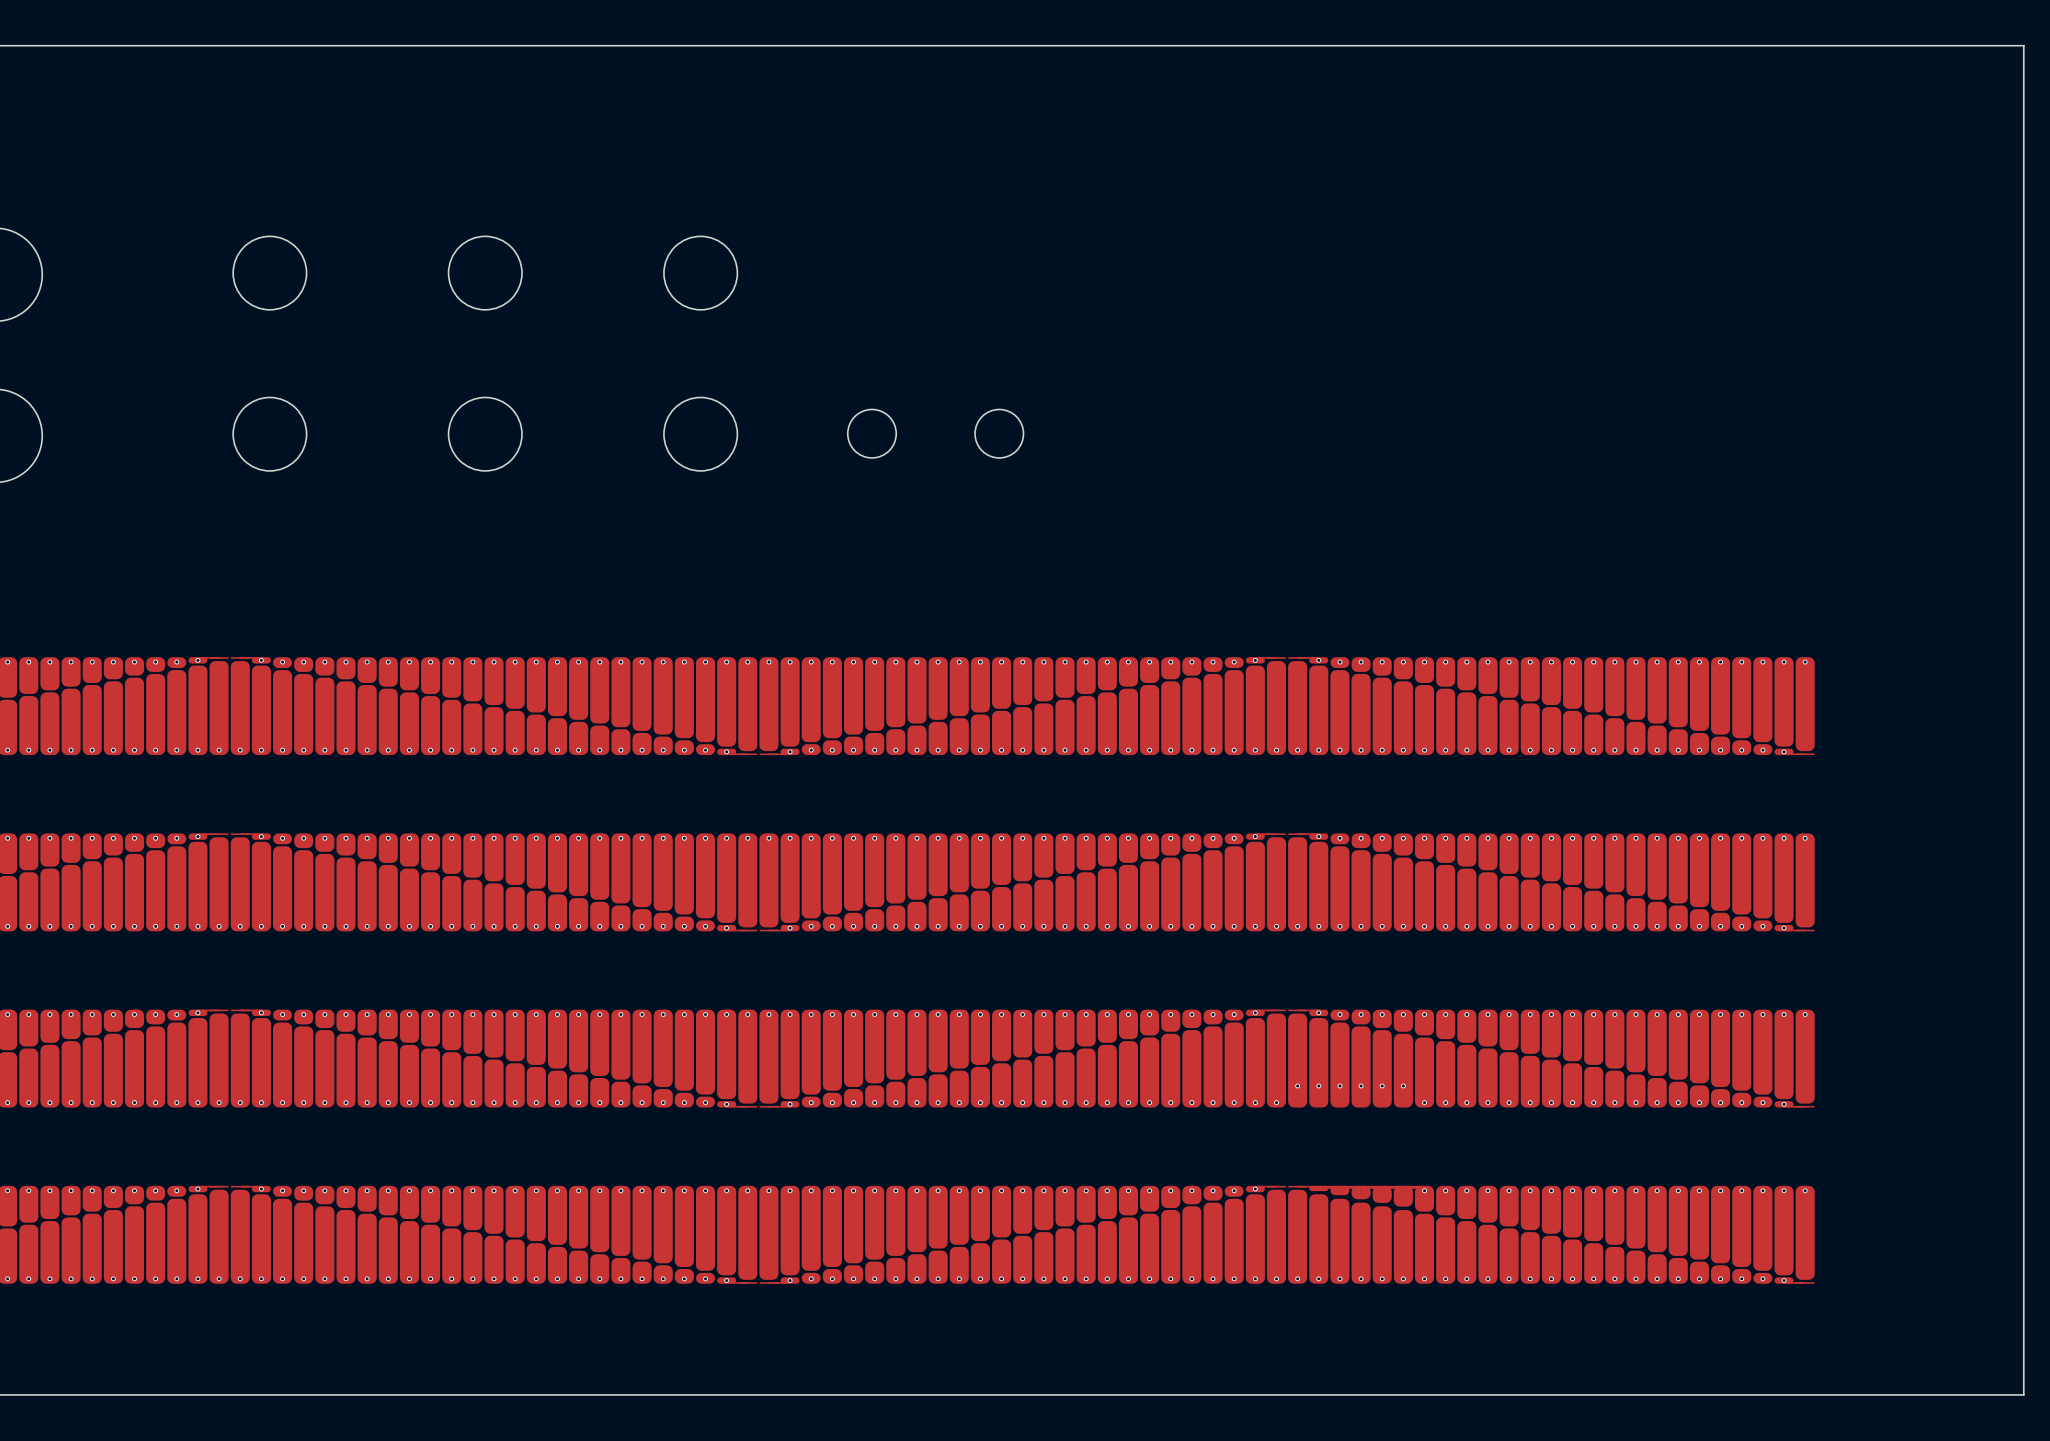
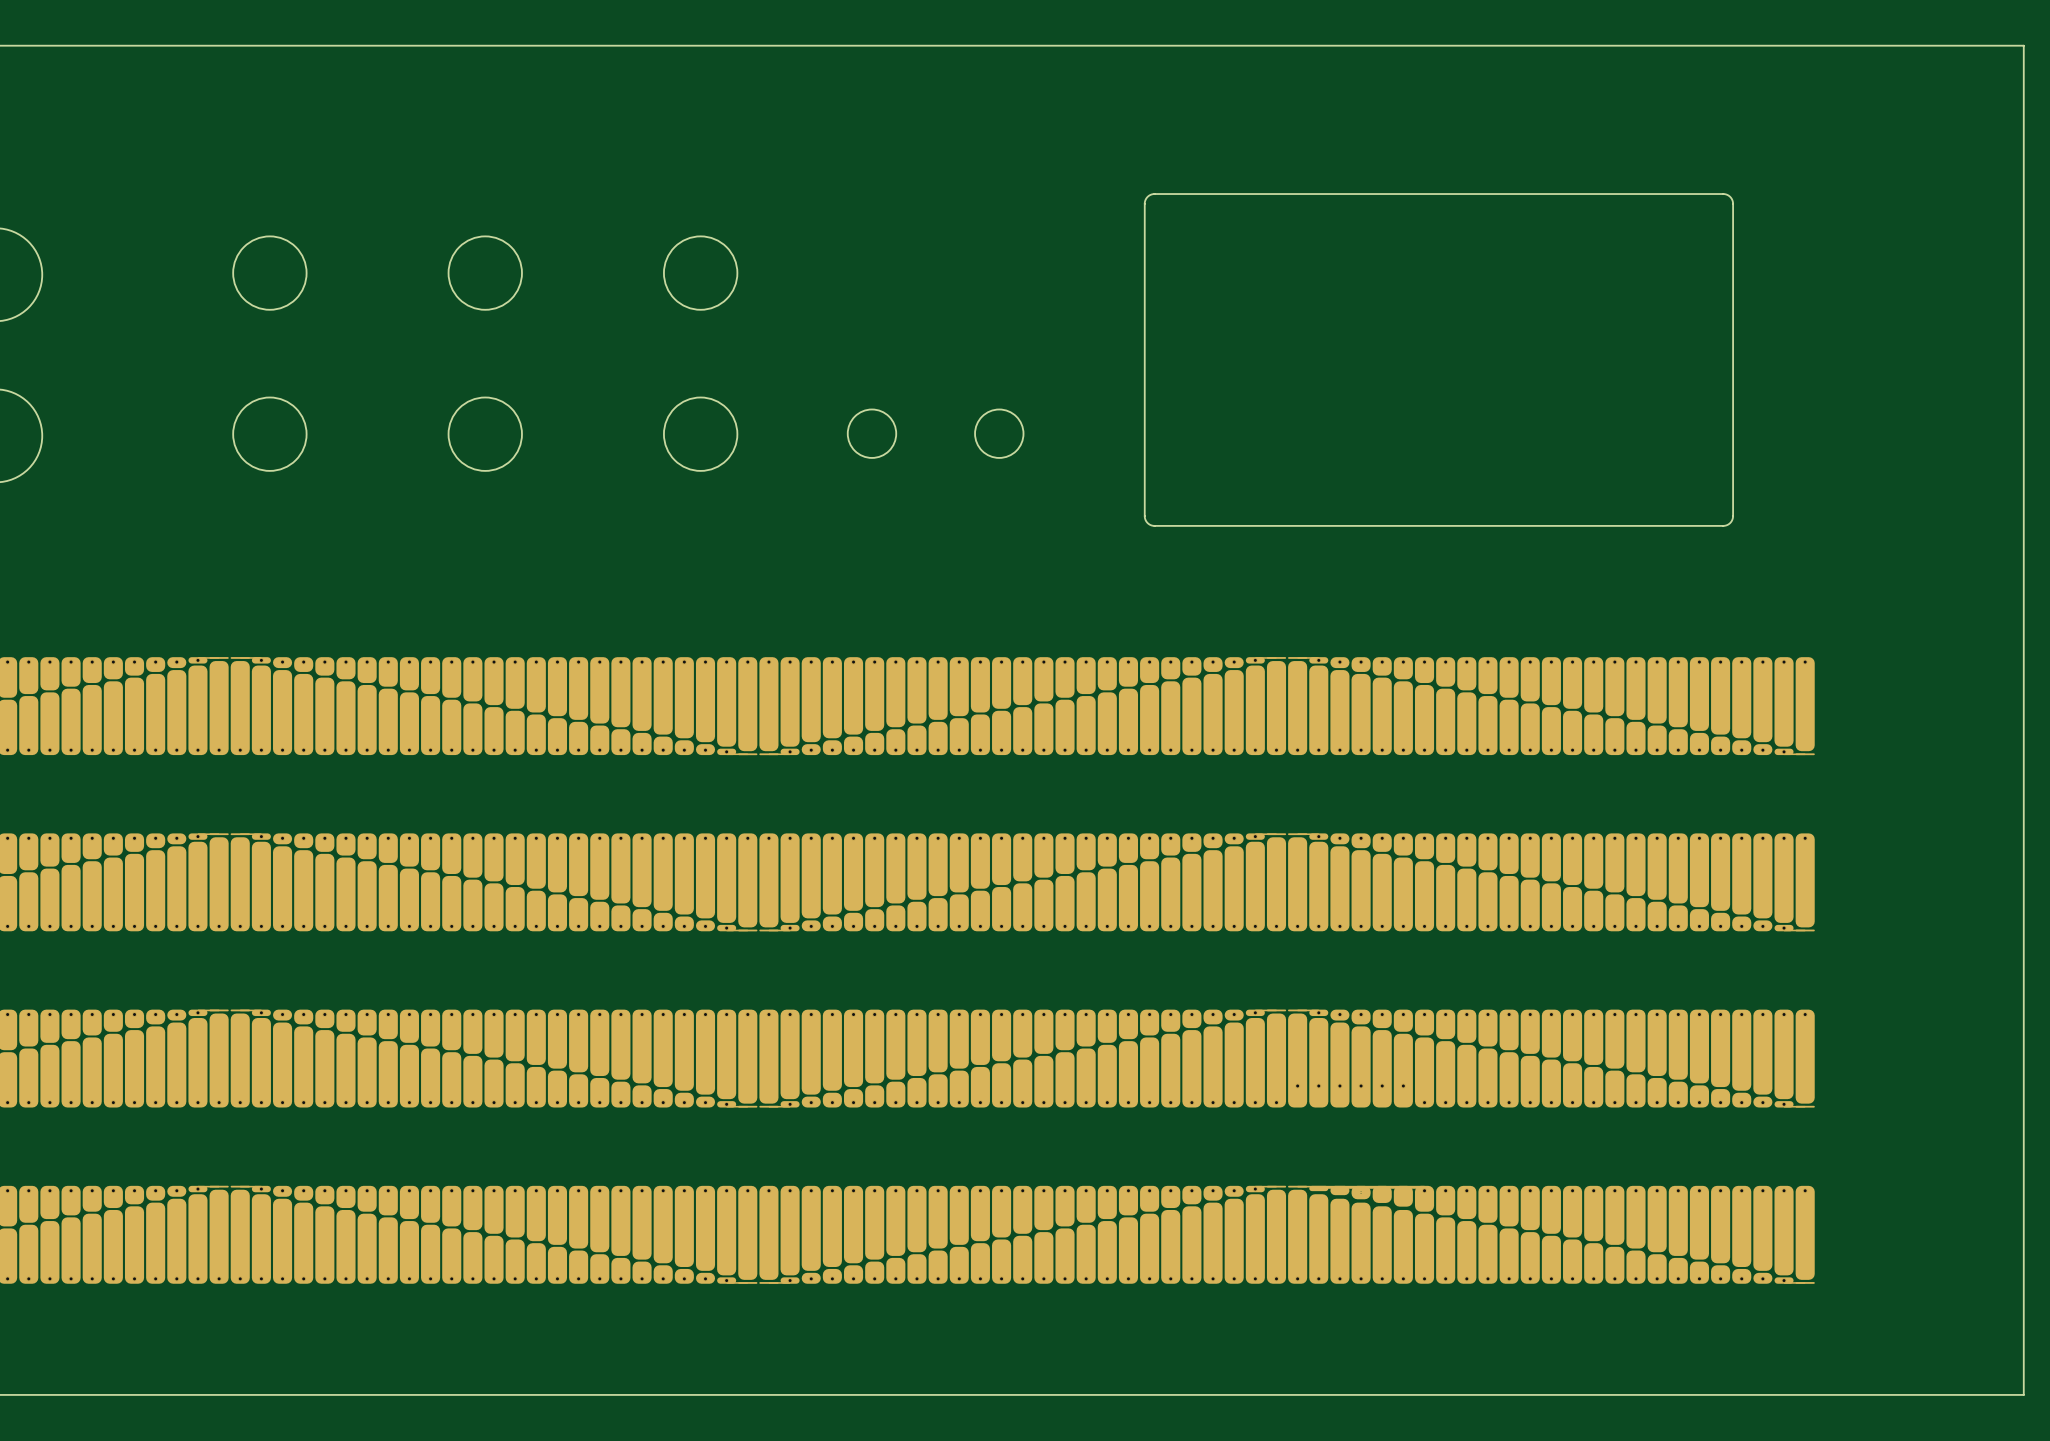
board edge: none -> (1154, 194) (1728, 195) (1733, 203) (1731, 521) (1723, 525) (1149, 524) (1144, 516) (1144, 203) (1147, 196) (1154, 194)

